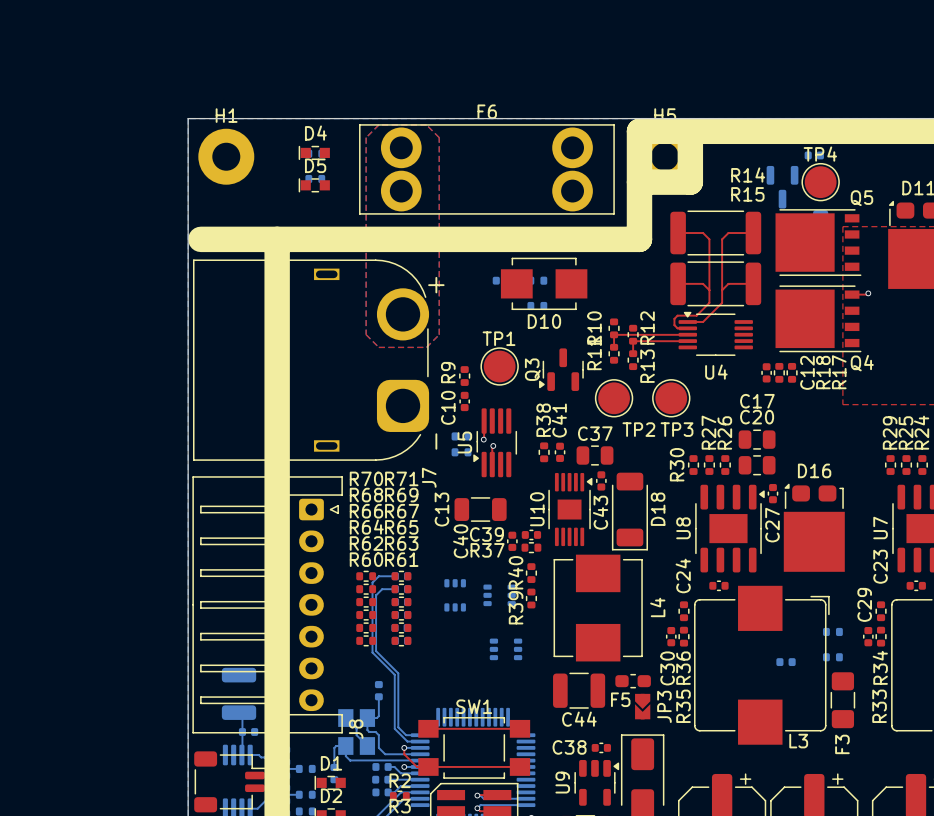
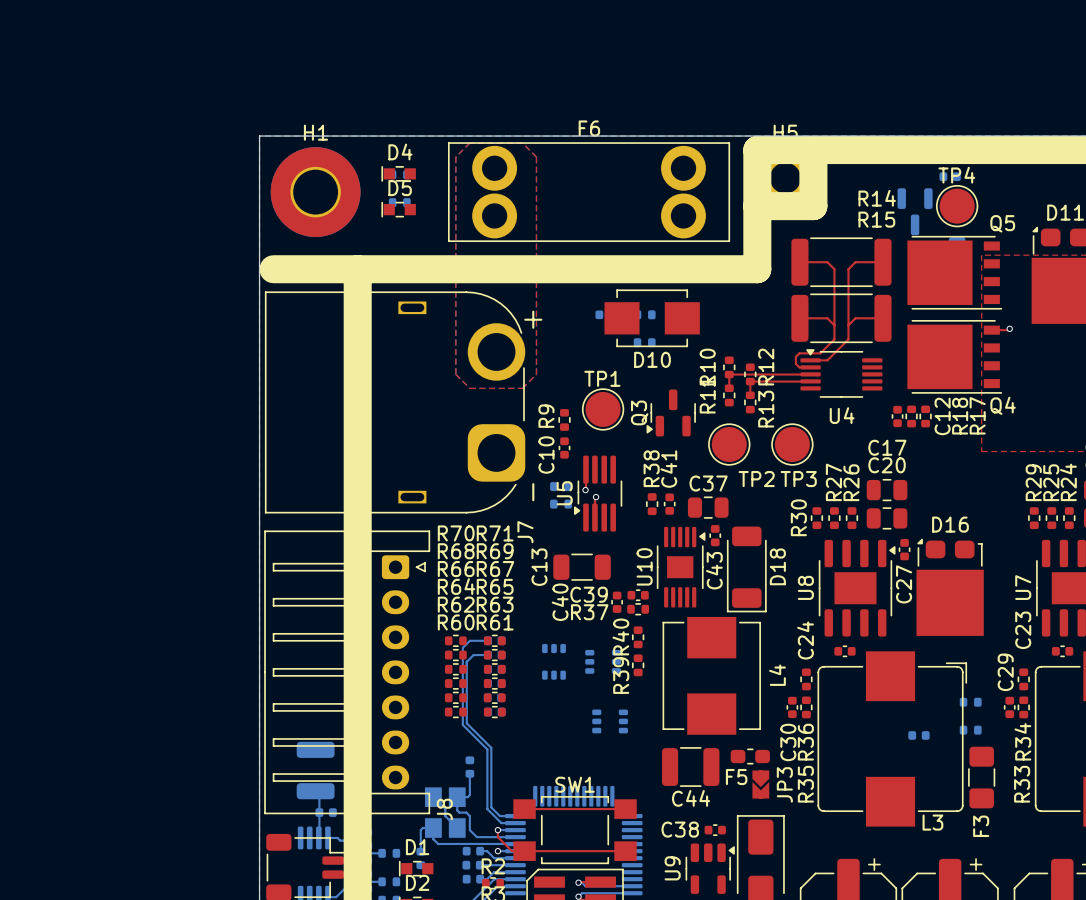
H1 footprint: [198, 128, 255, 185] -> [270, 147, 361, 237]

